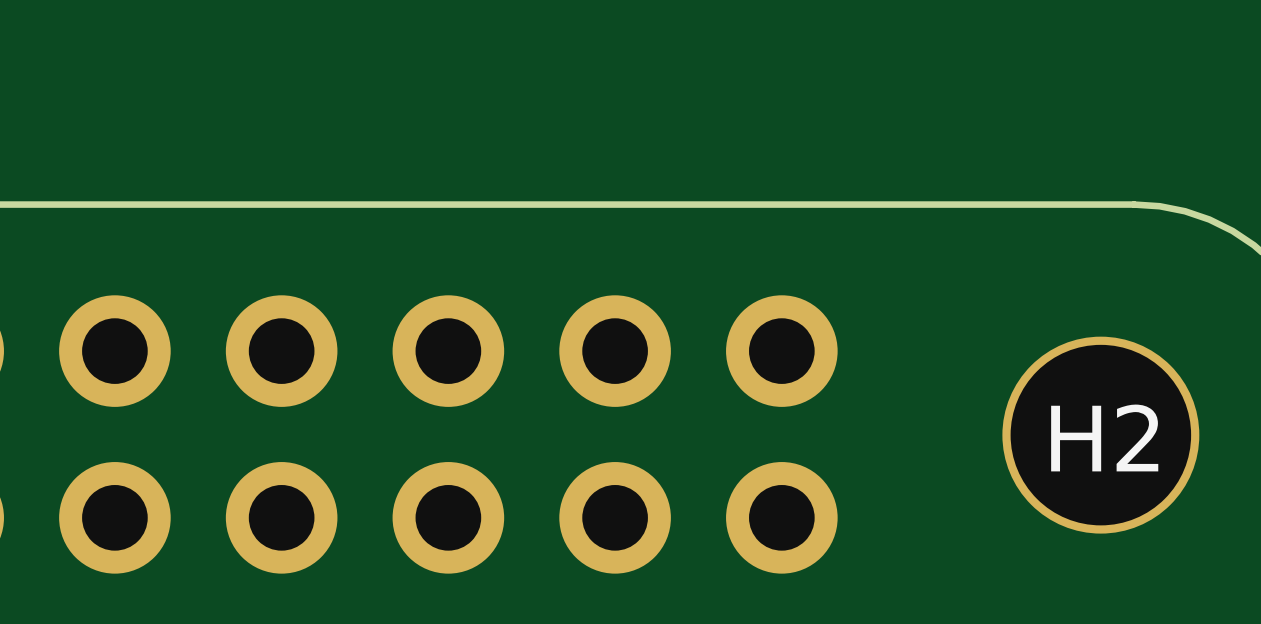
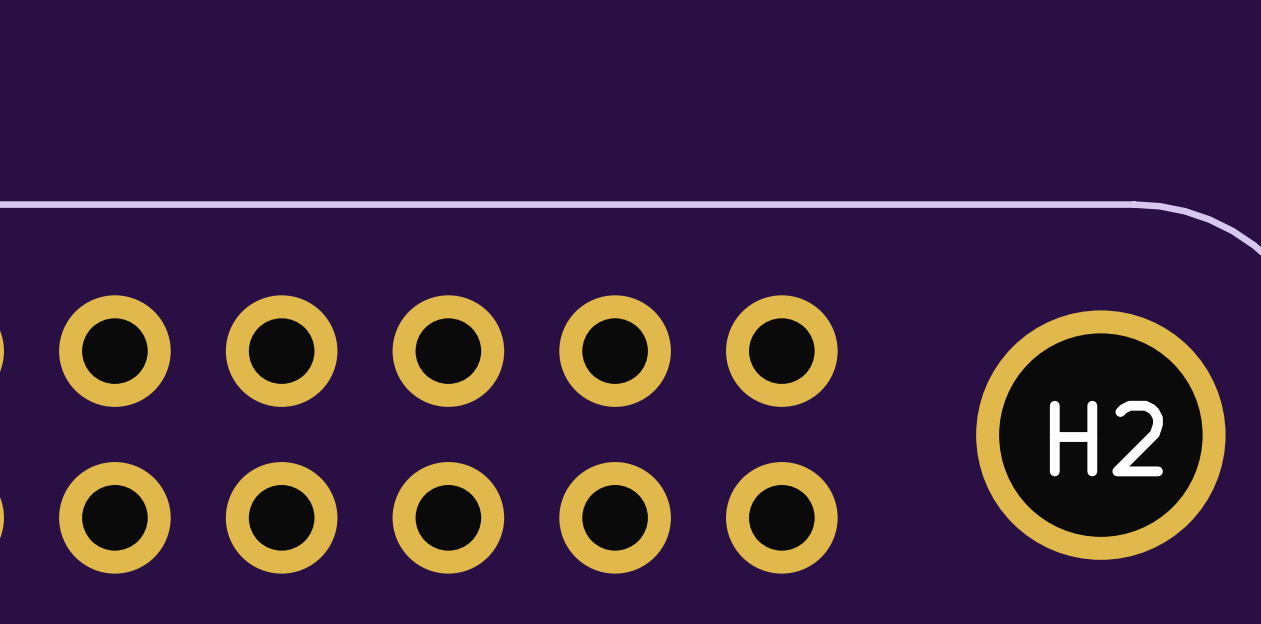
H2 footprint: [1002, 336, 1200, 534] -> [976, 310, 1226, 560]

